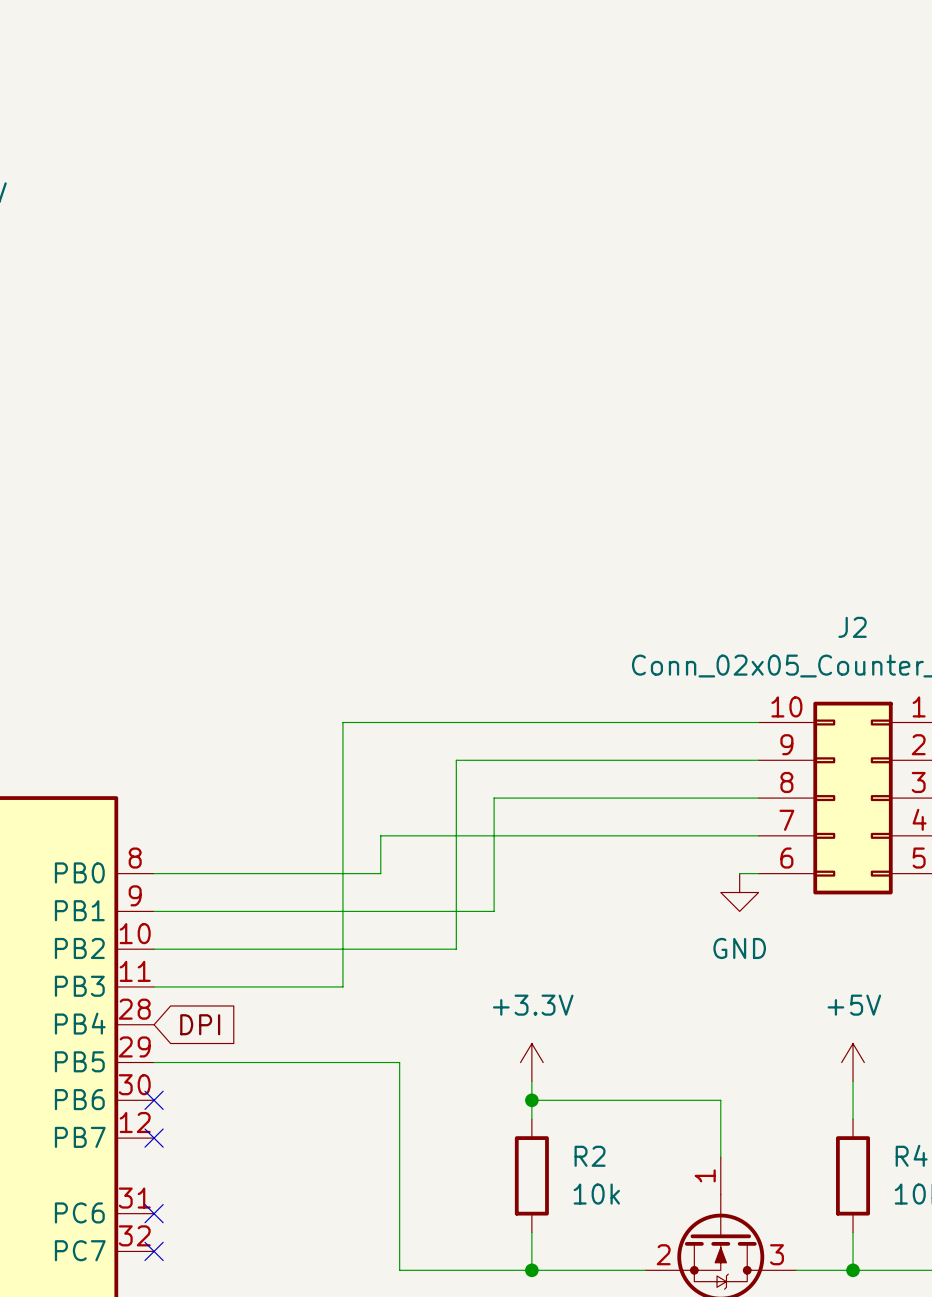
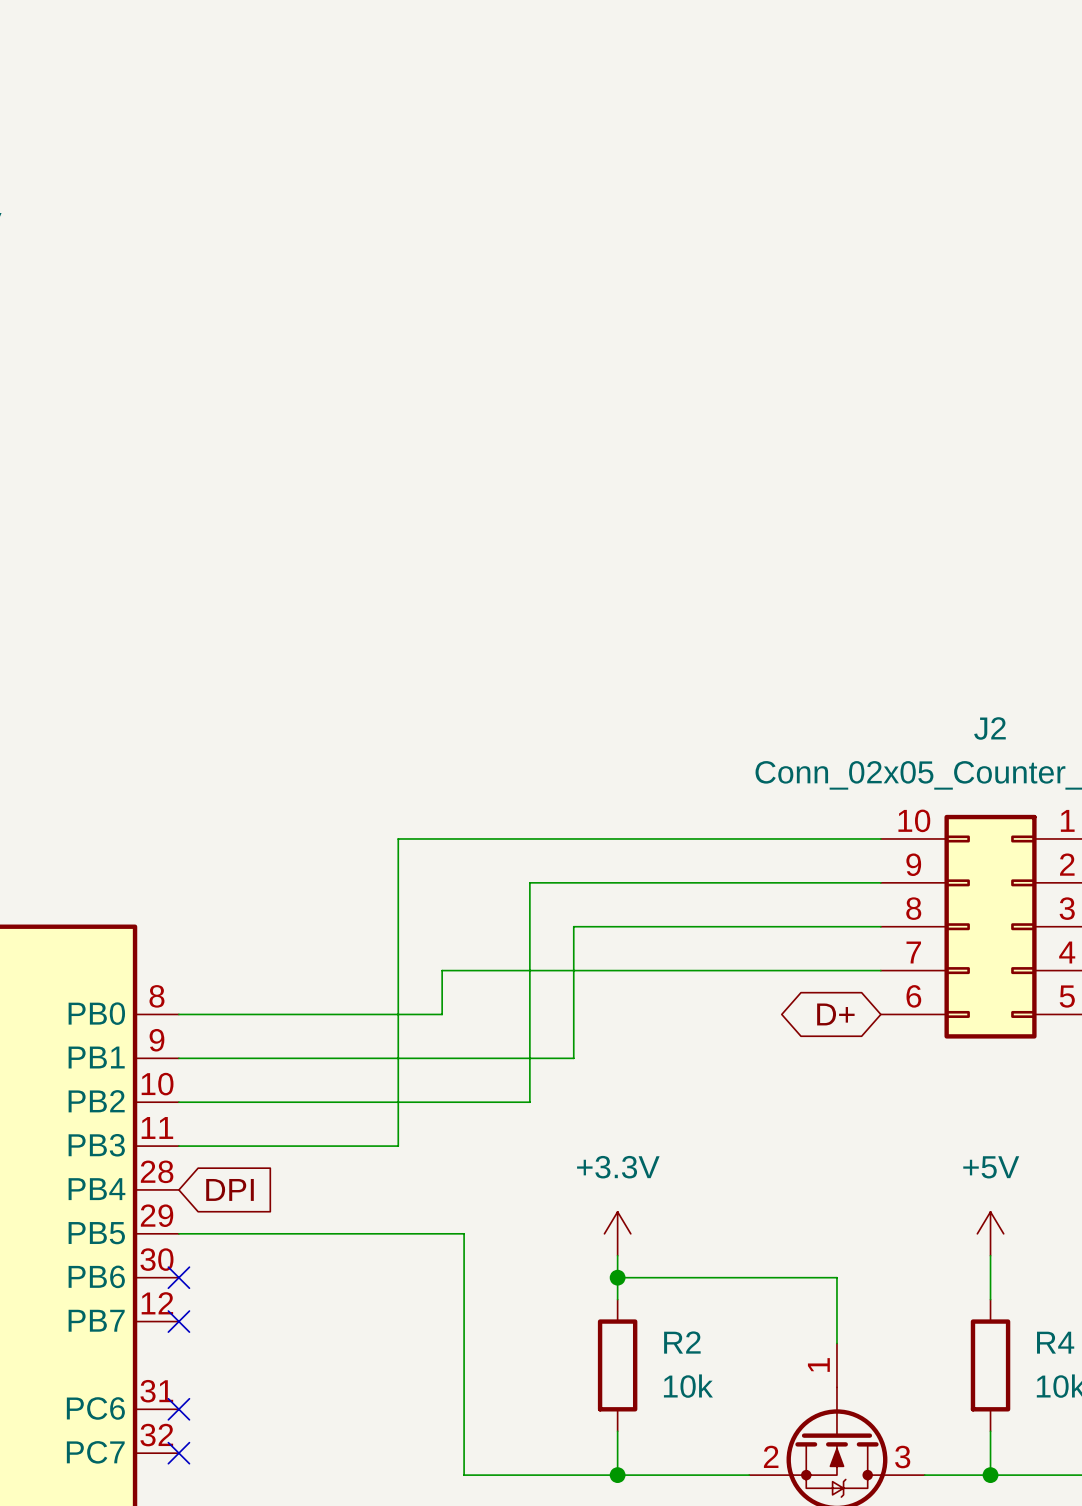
global label: none -> D+ (835, 1014)
wire: (739, 873) (758, 873) -> none
power symbol: GND (739, 892) -> none

